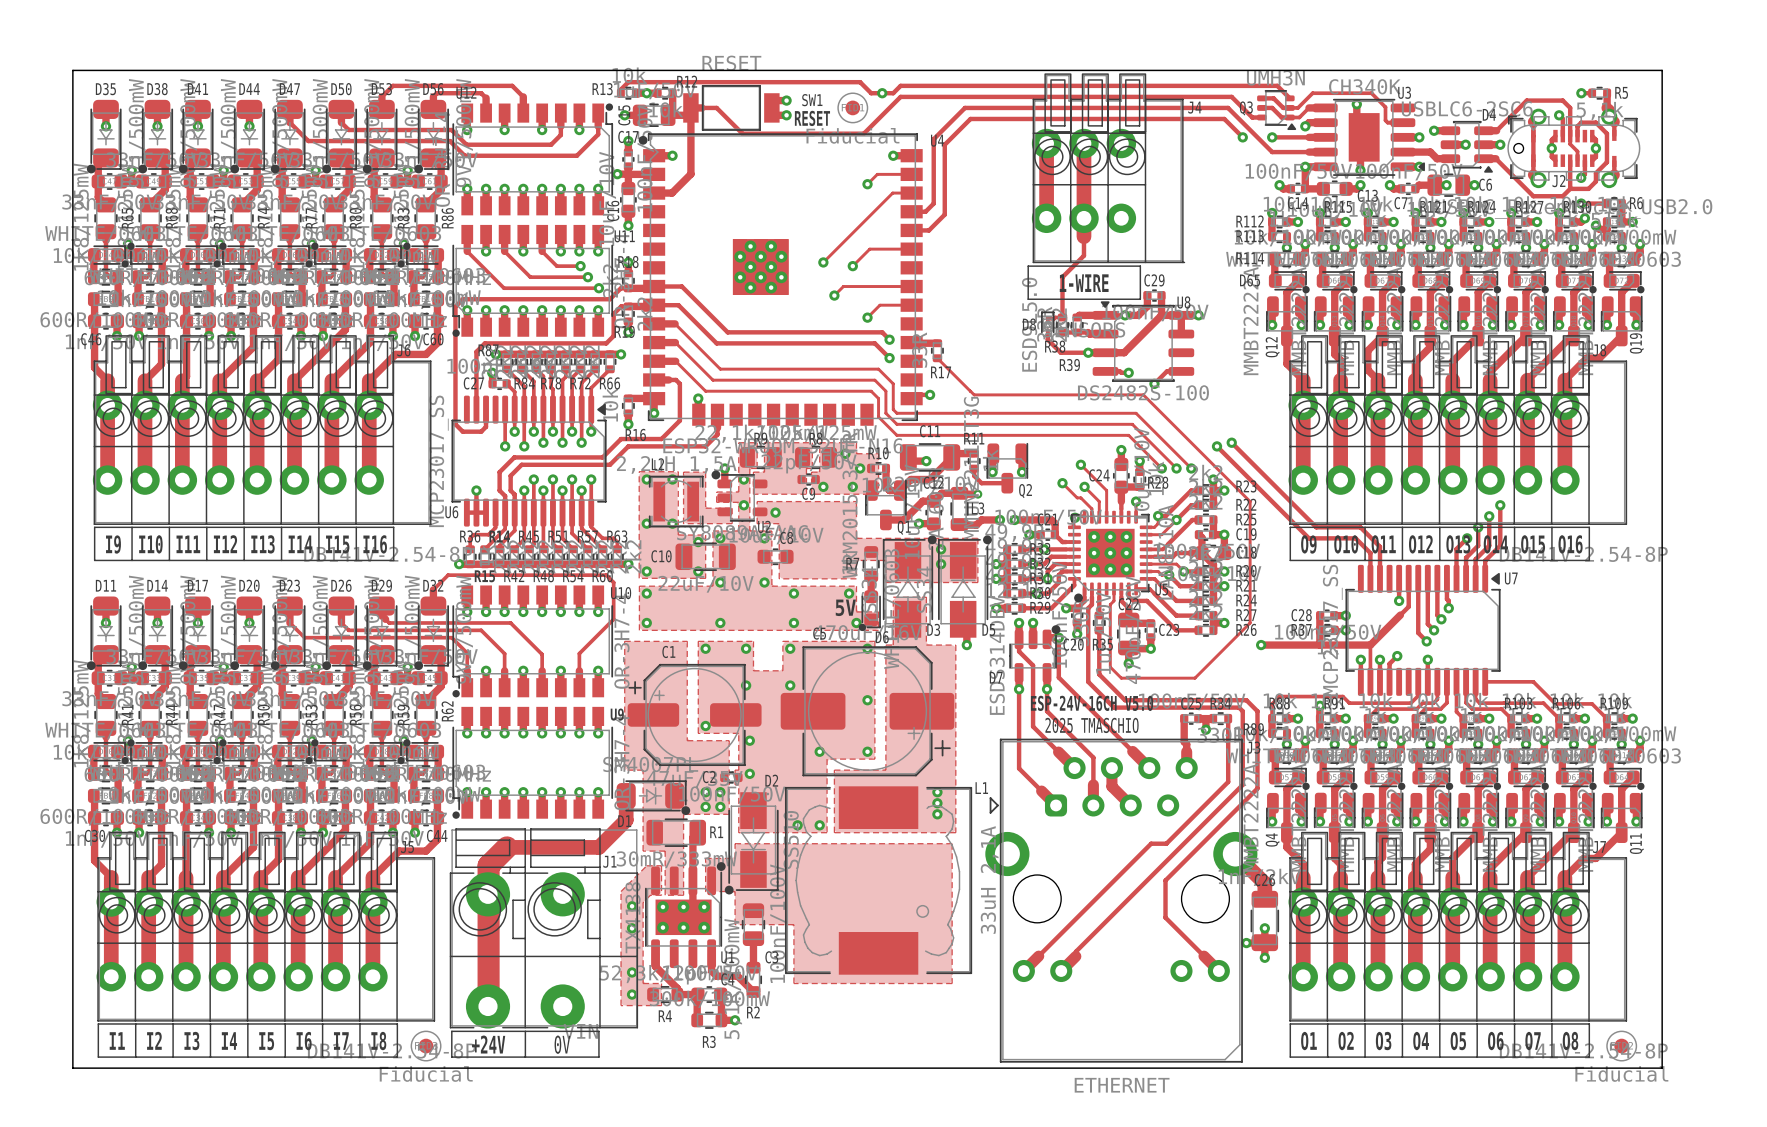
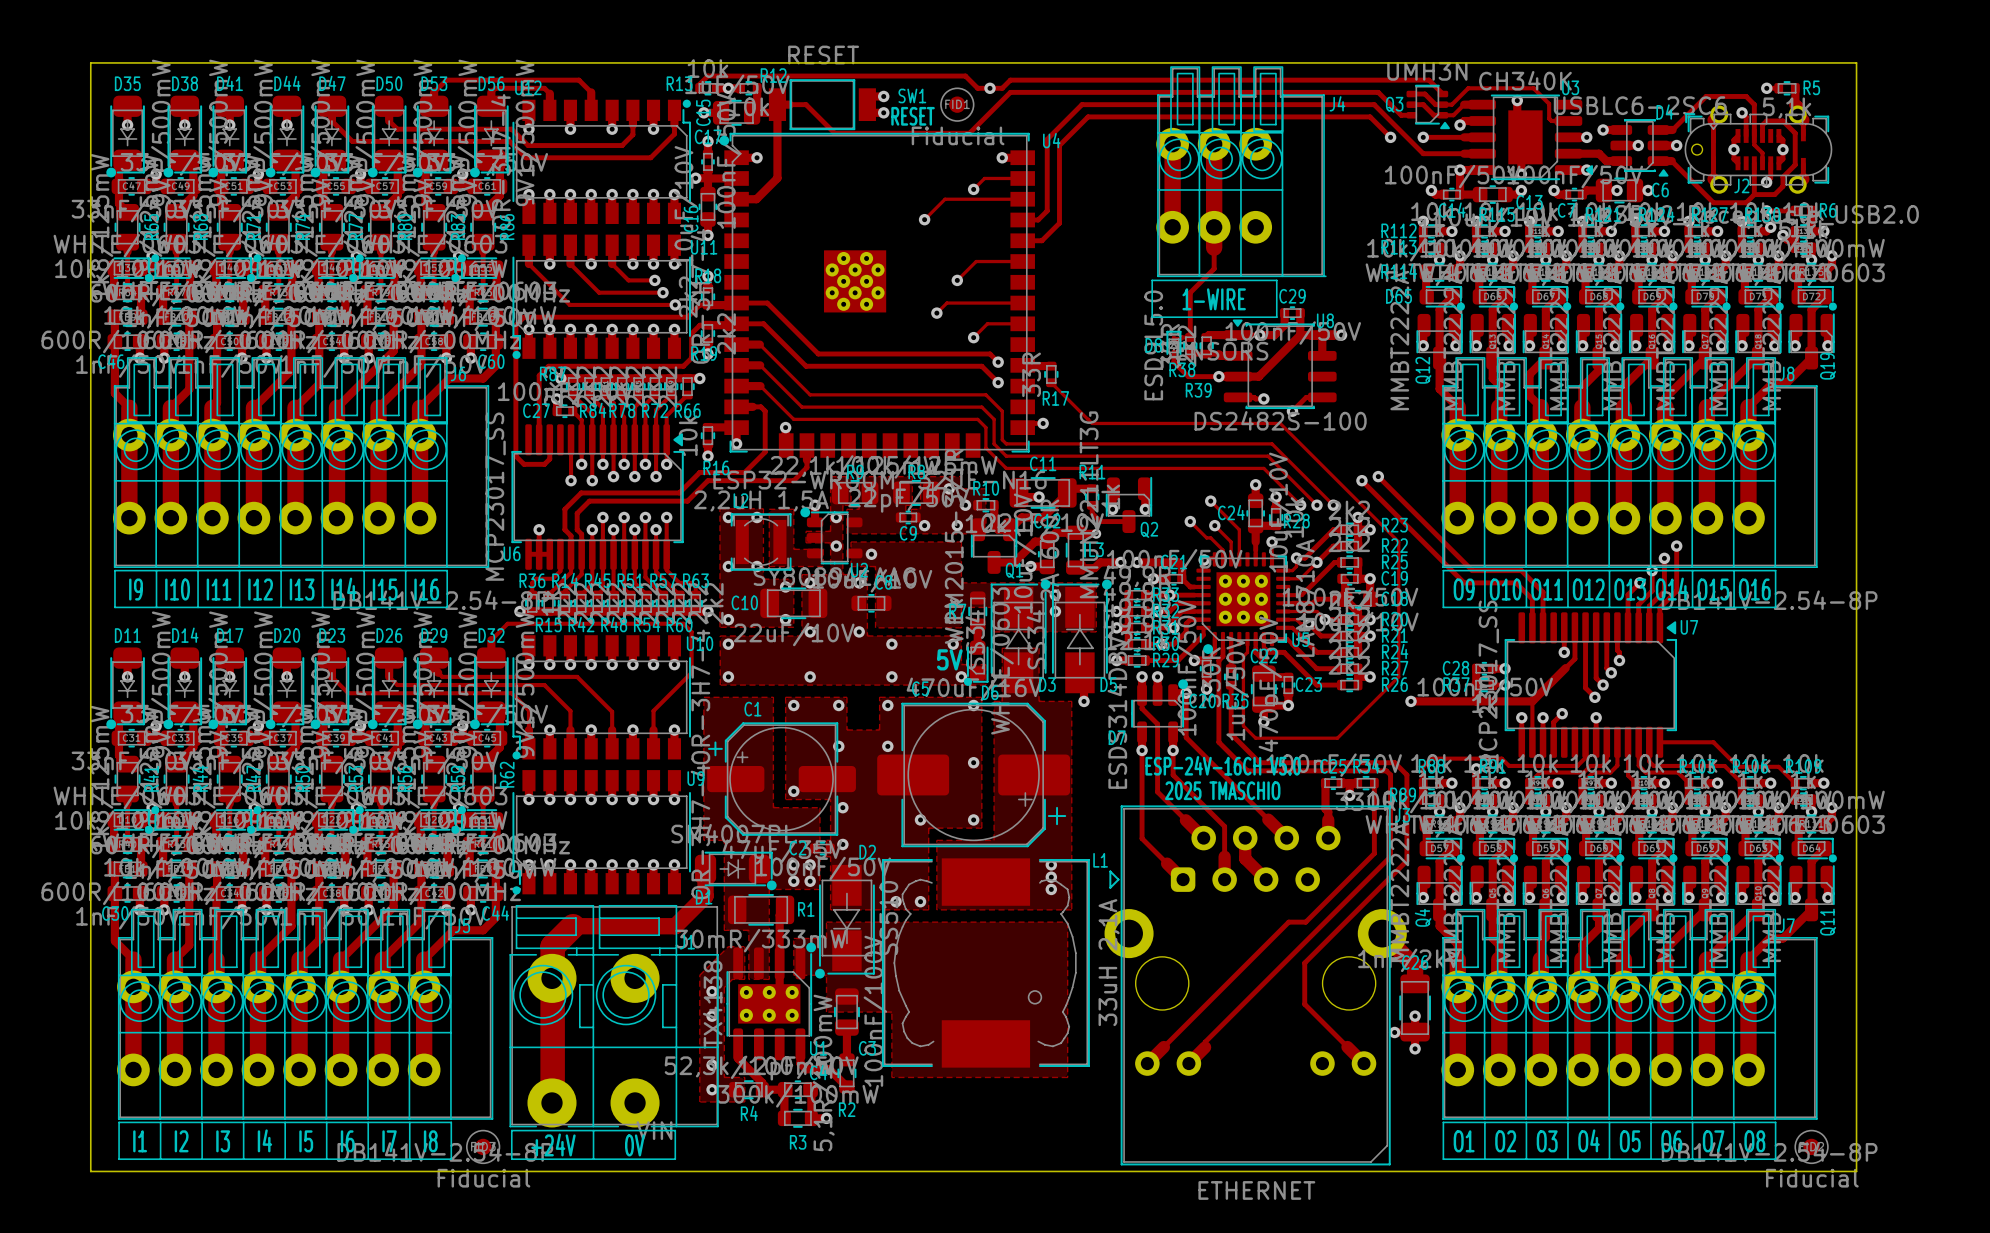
track: (892, 193) (823, 262) -> (1001, 199) (945, 199) (924, 219)
via position: (823, 262) -> (924, 219)

